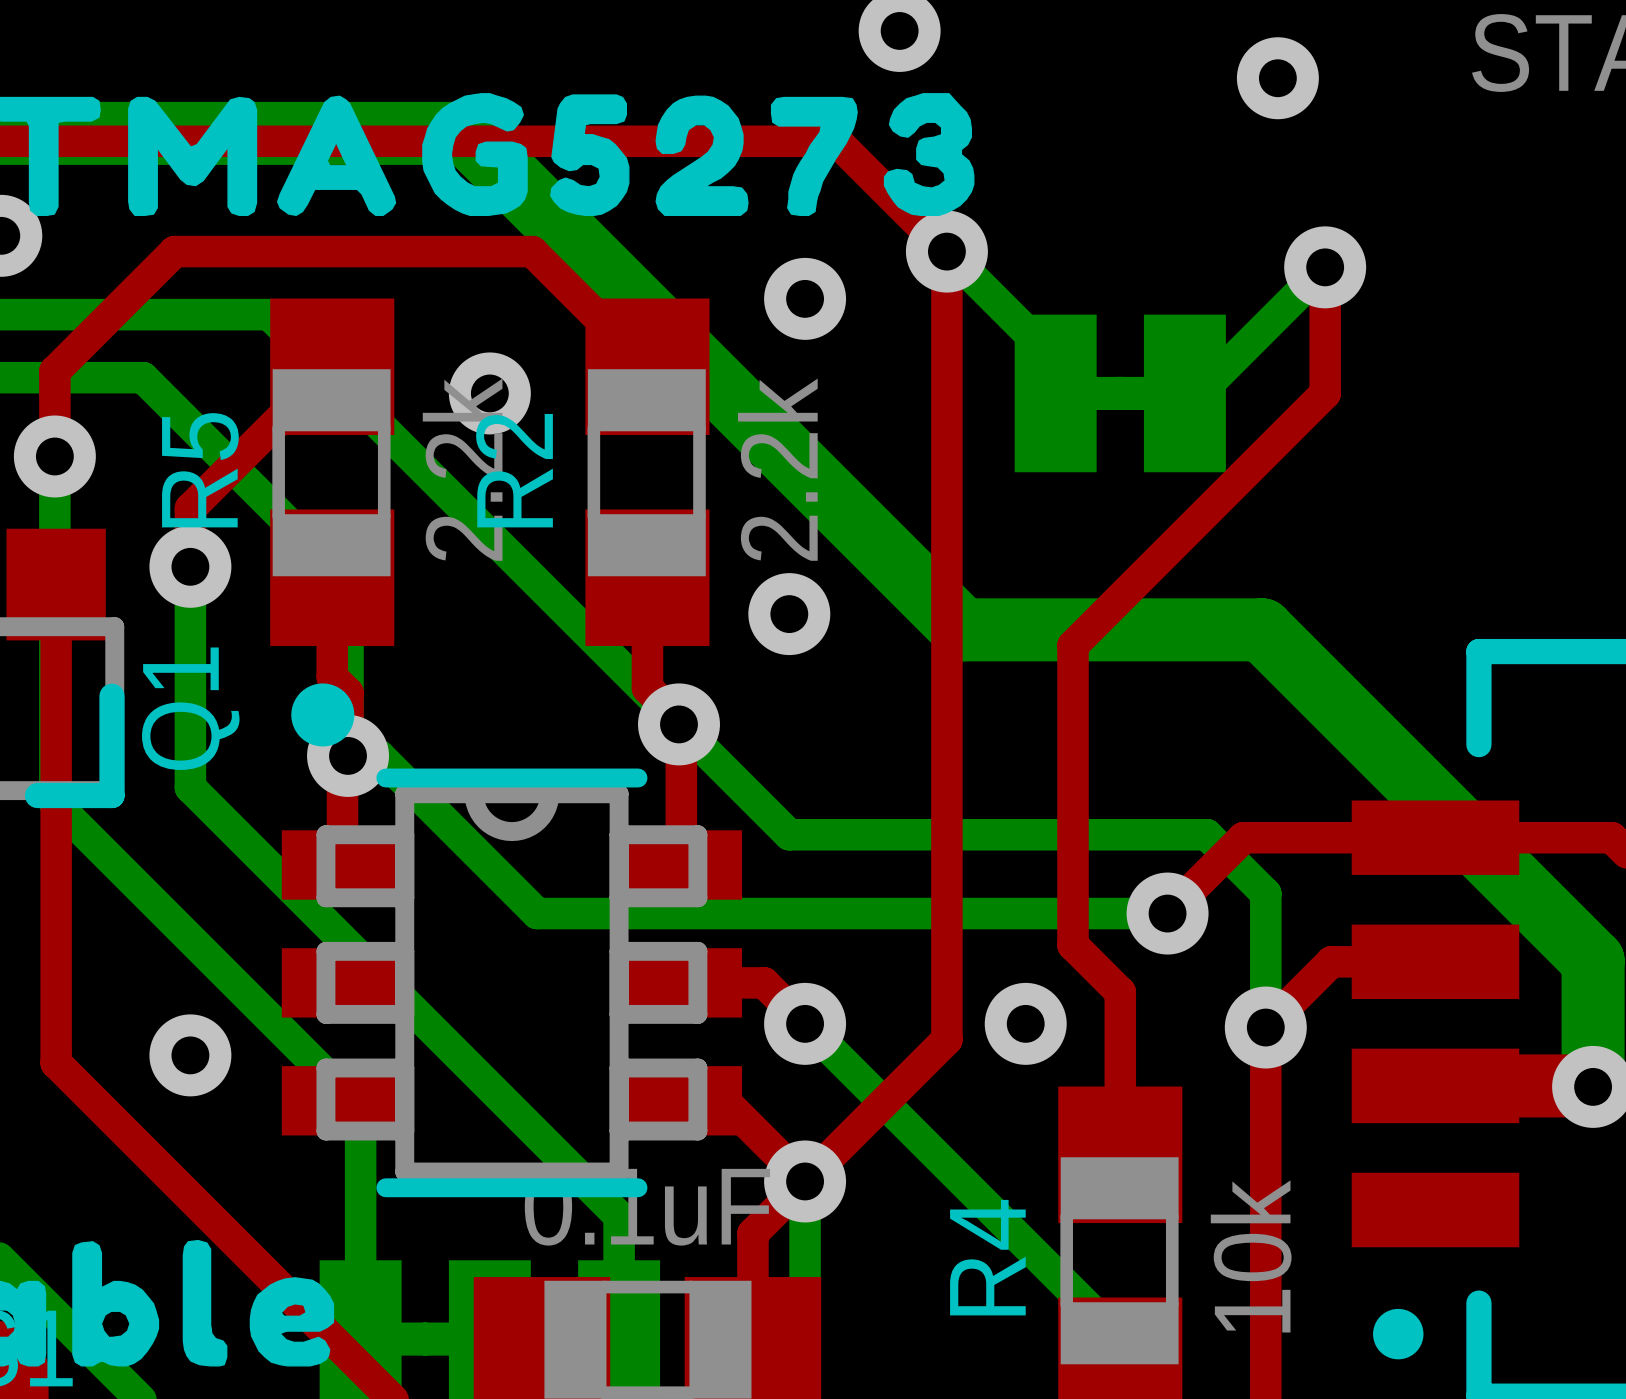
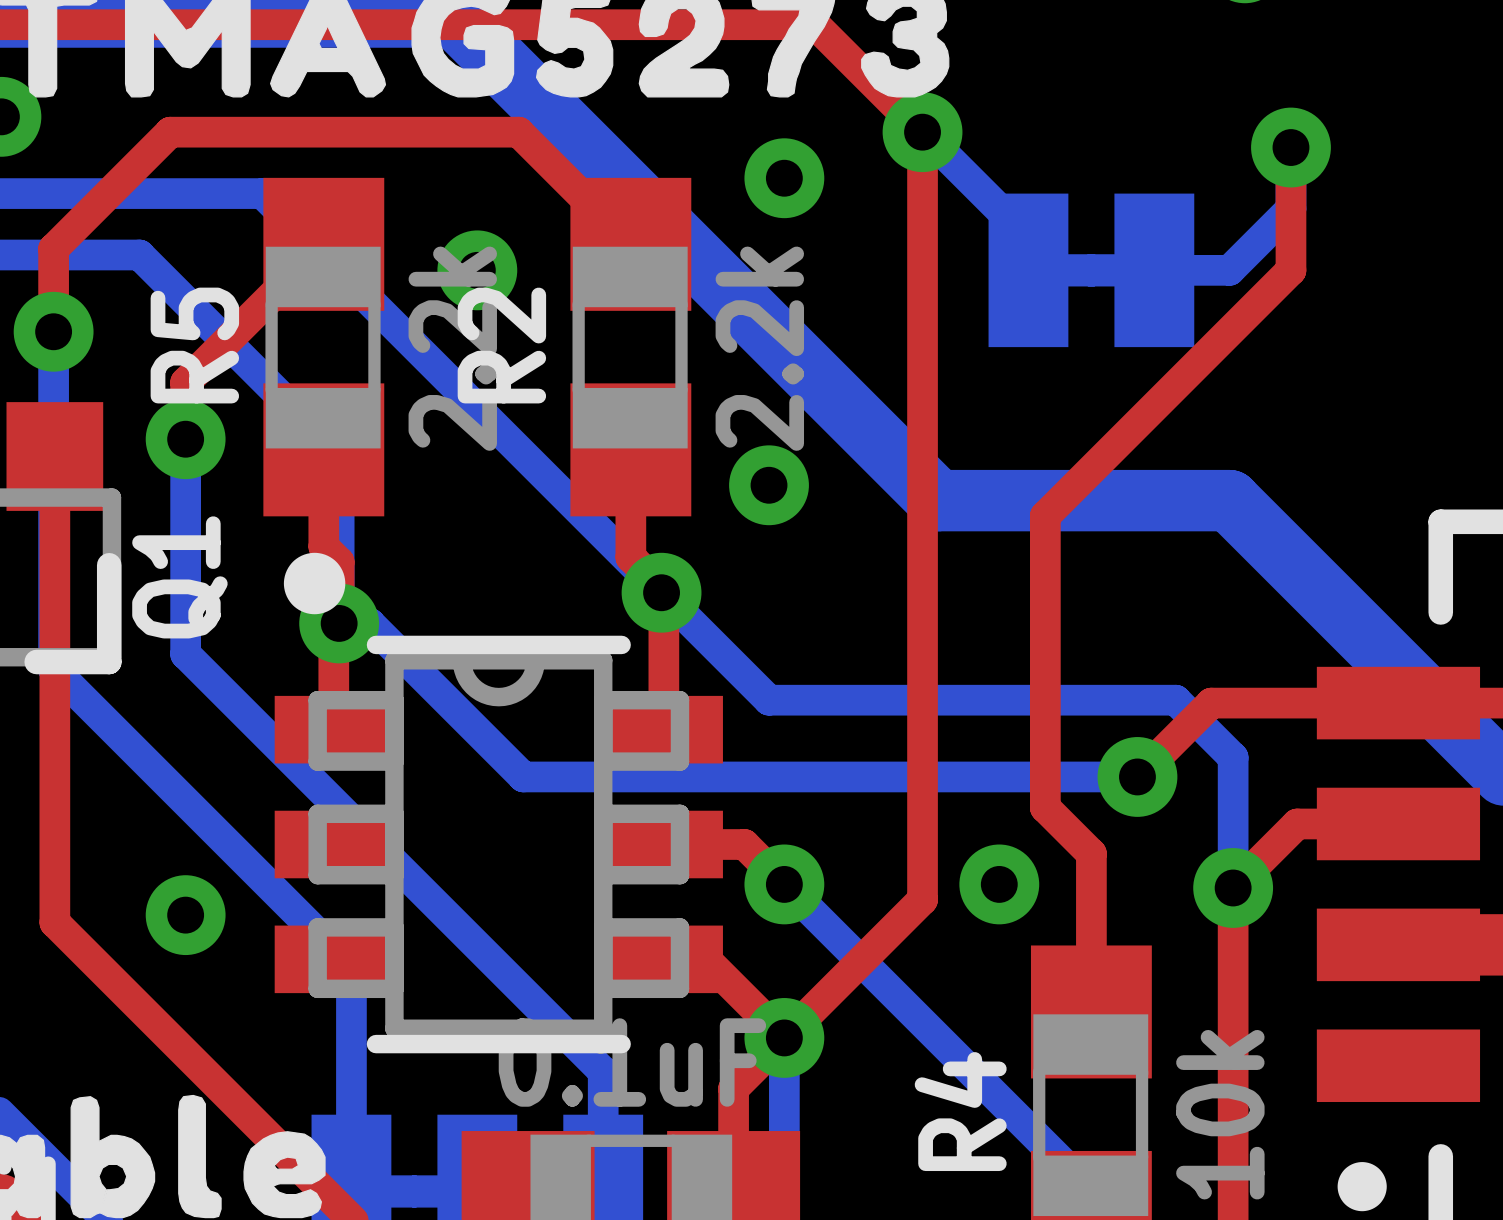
bottom track: (1325, 267) (1199, 393) -> (1290, 147) (1290, 208) (1229, 270) (1168, 270)

